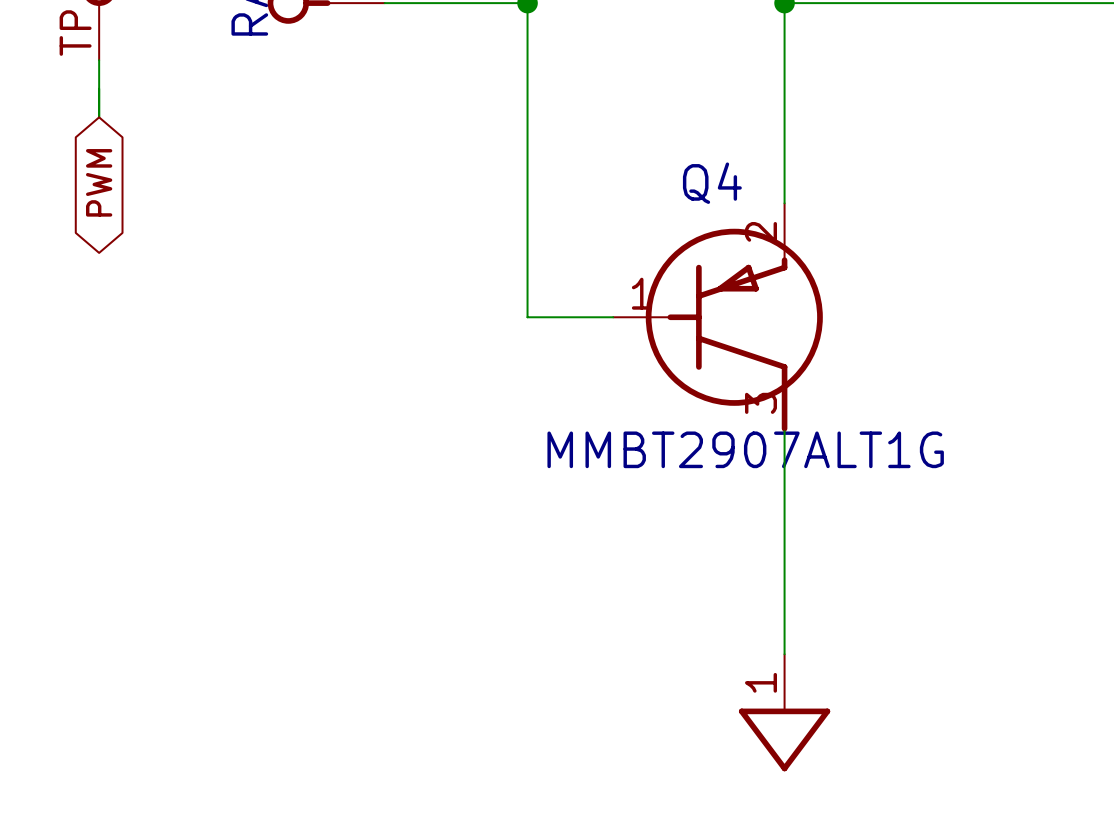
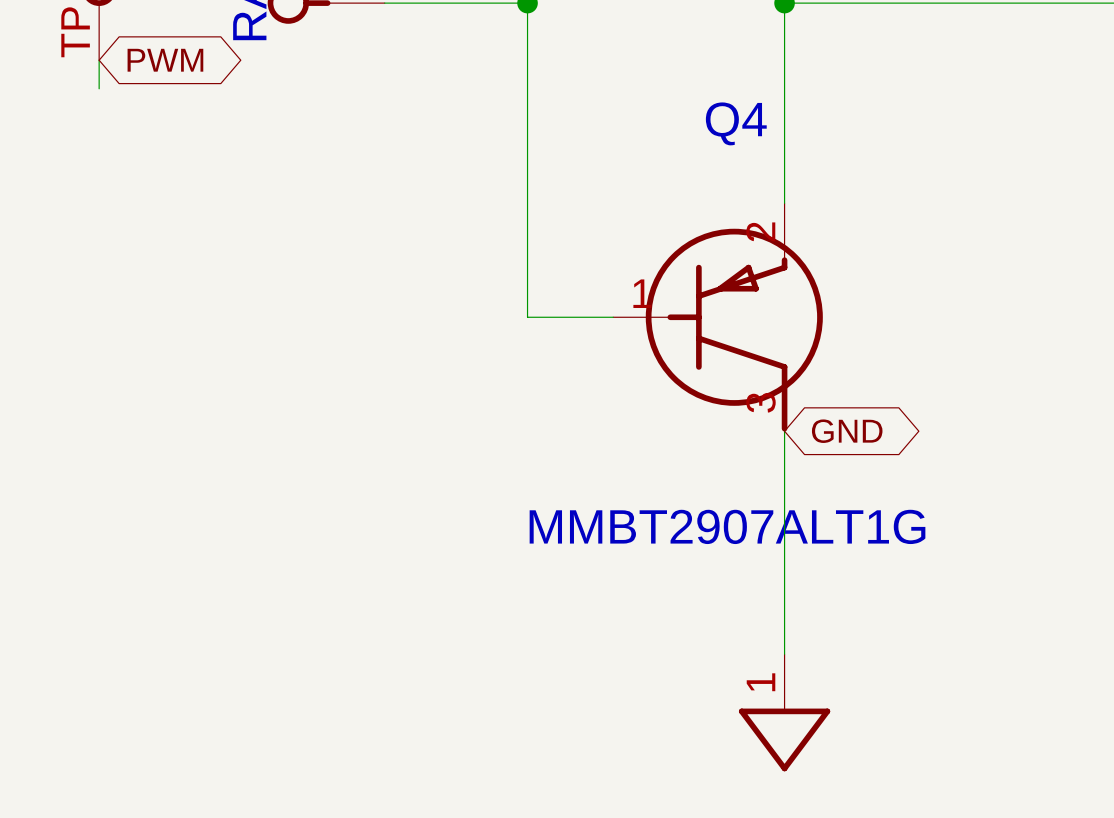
wire: (99, 88) (99, 117) -> none
global label rotation: 0° (99, 182) -> 90° counterclockwise (165, 60)
global label position: PWM (99, 182) -> PWM (165, 60)
text position: Q4 (712, 183) -> Q4 (736, 123)
global label: none -> GND (847, 431)
text position: MMBT2907ALT1G (745, 449) -> MMBT2907ALT1G (727, 526)

